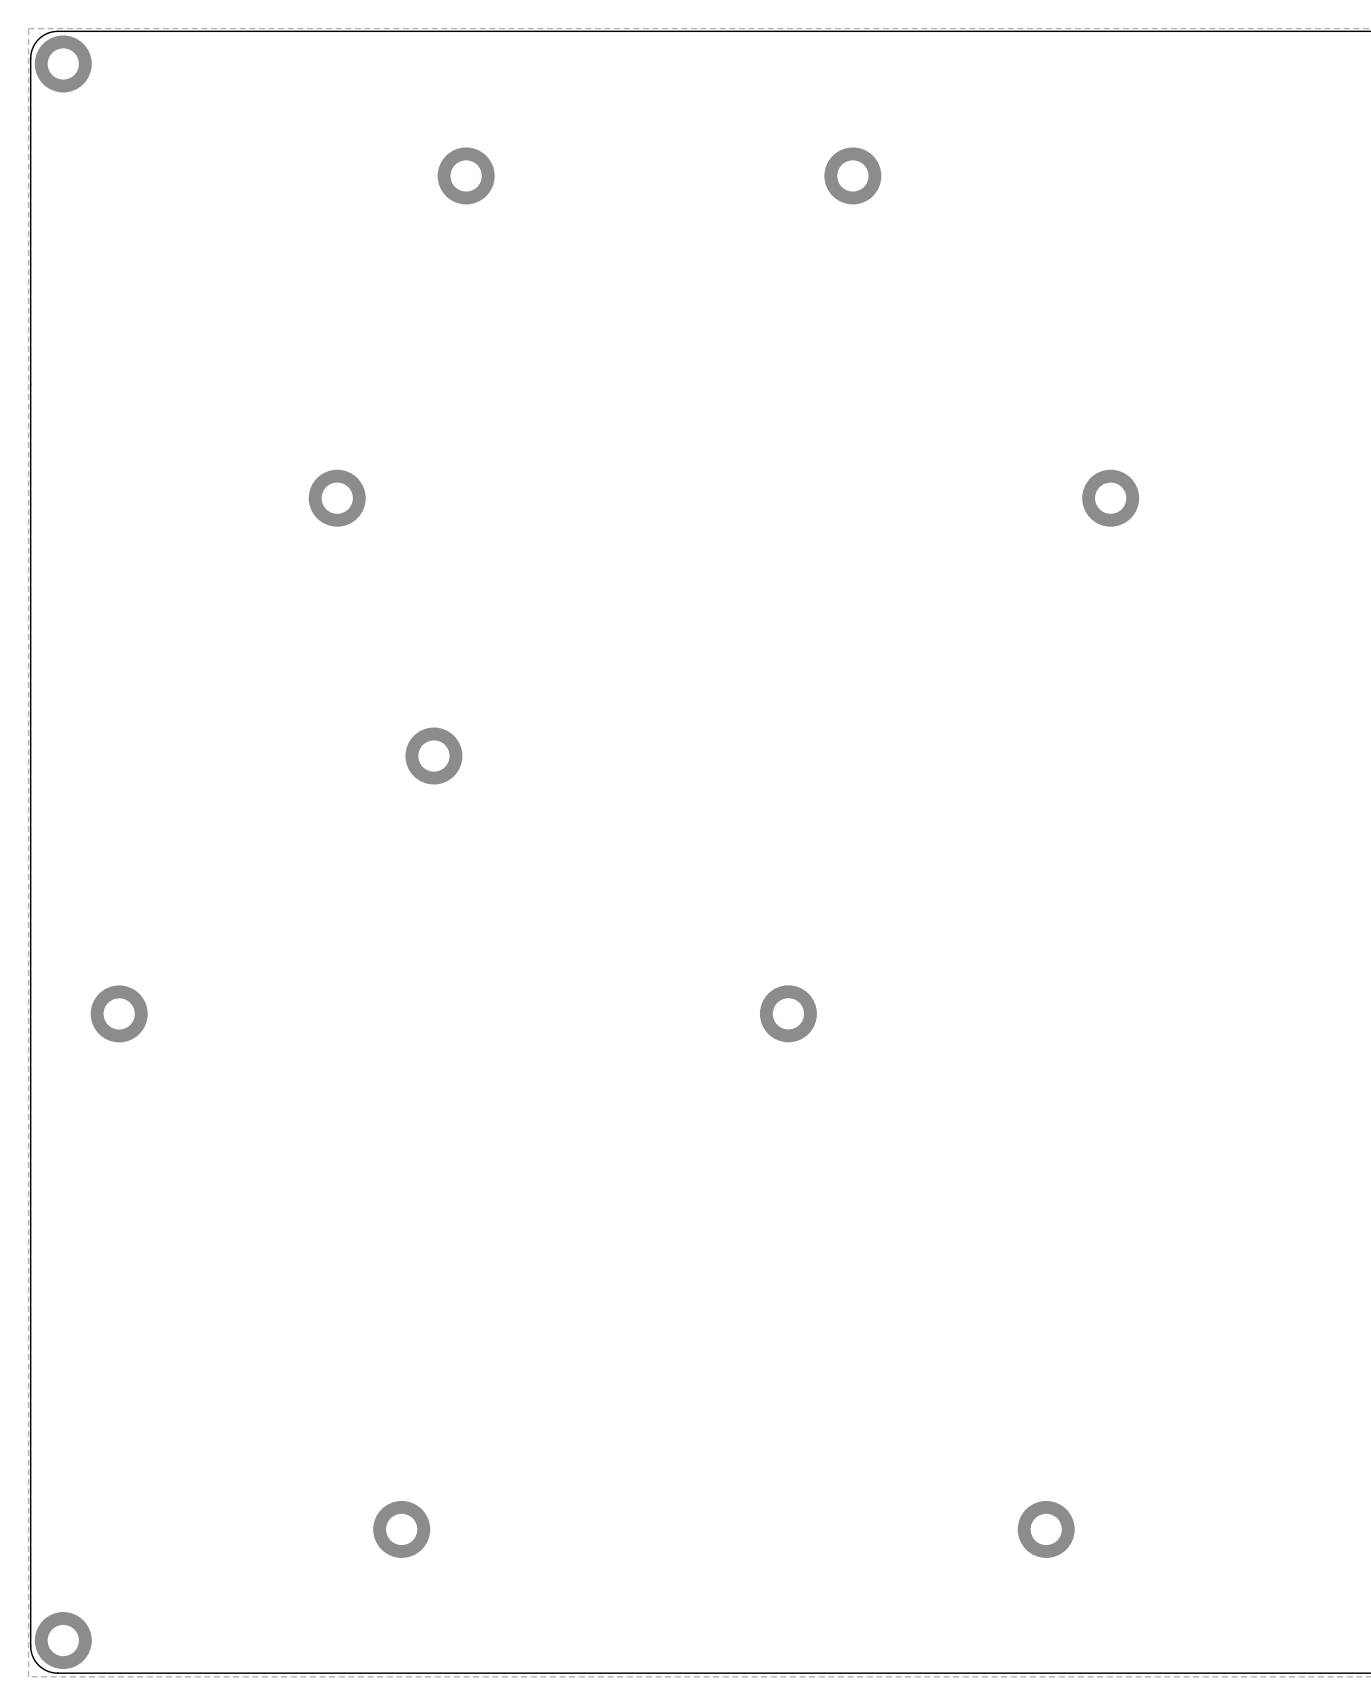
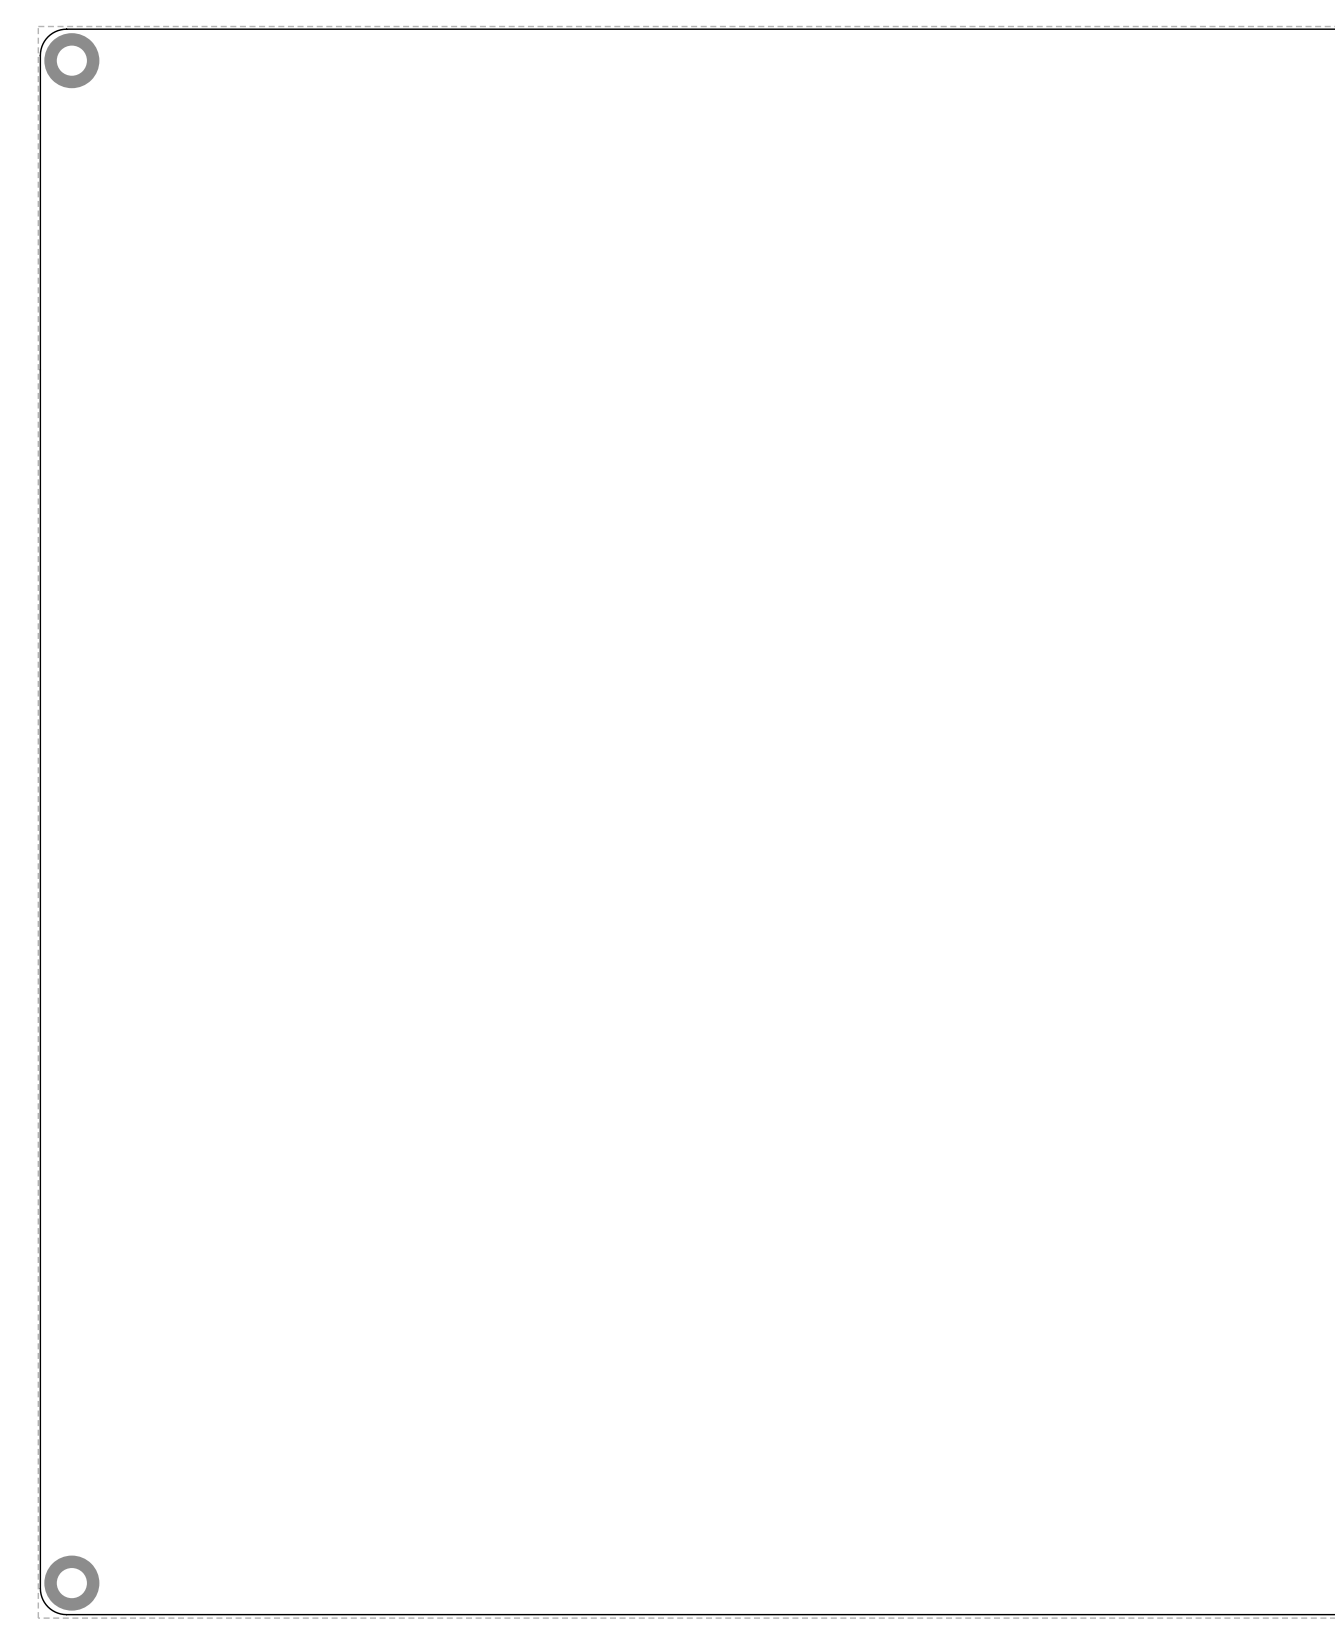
part: (466, 175) -> none
part: (852, 175) -> none
part: (337, 498) -> none
part: (1110, 498) -> none
part: (433, 756) -> none
part: (119, 1013) -> none
part: (788, 1013) -> none
part: (401, 1529) -> none
part: (1046, 1529) -> none

